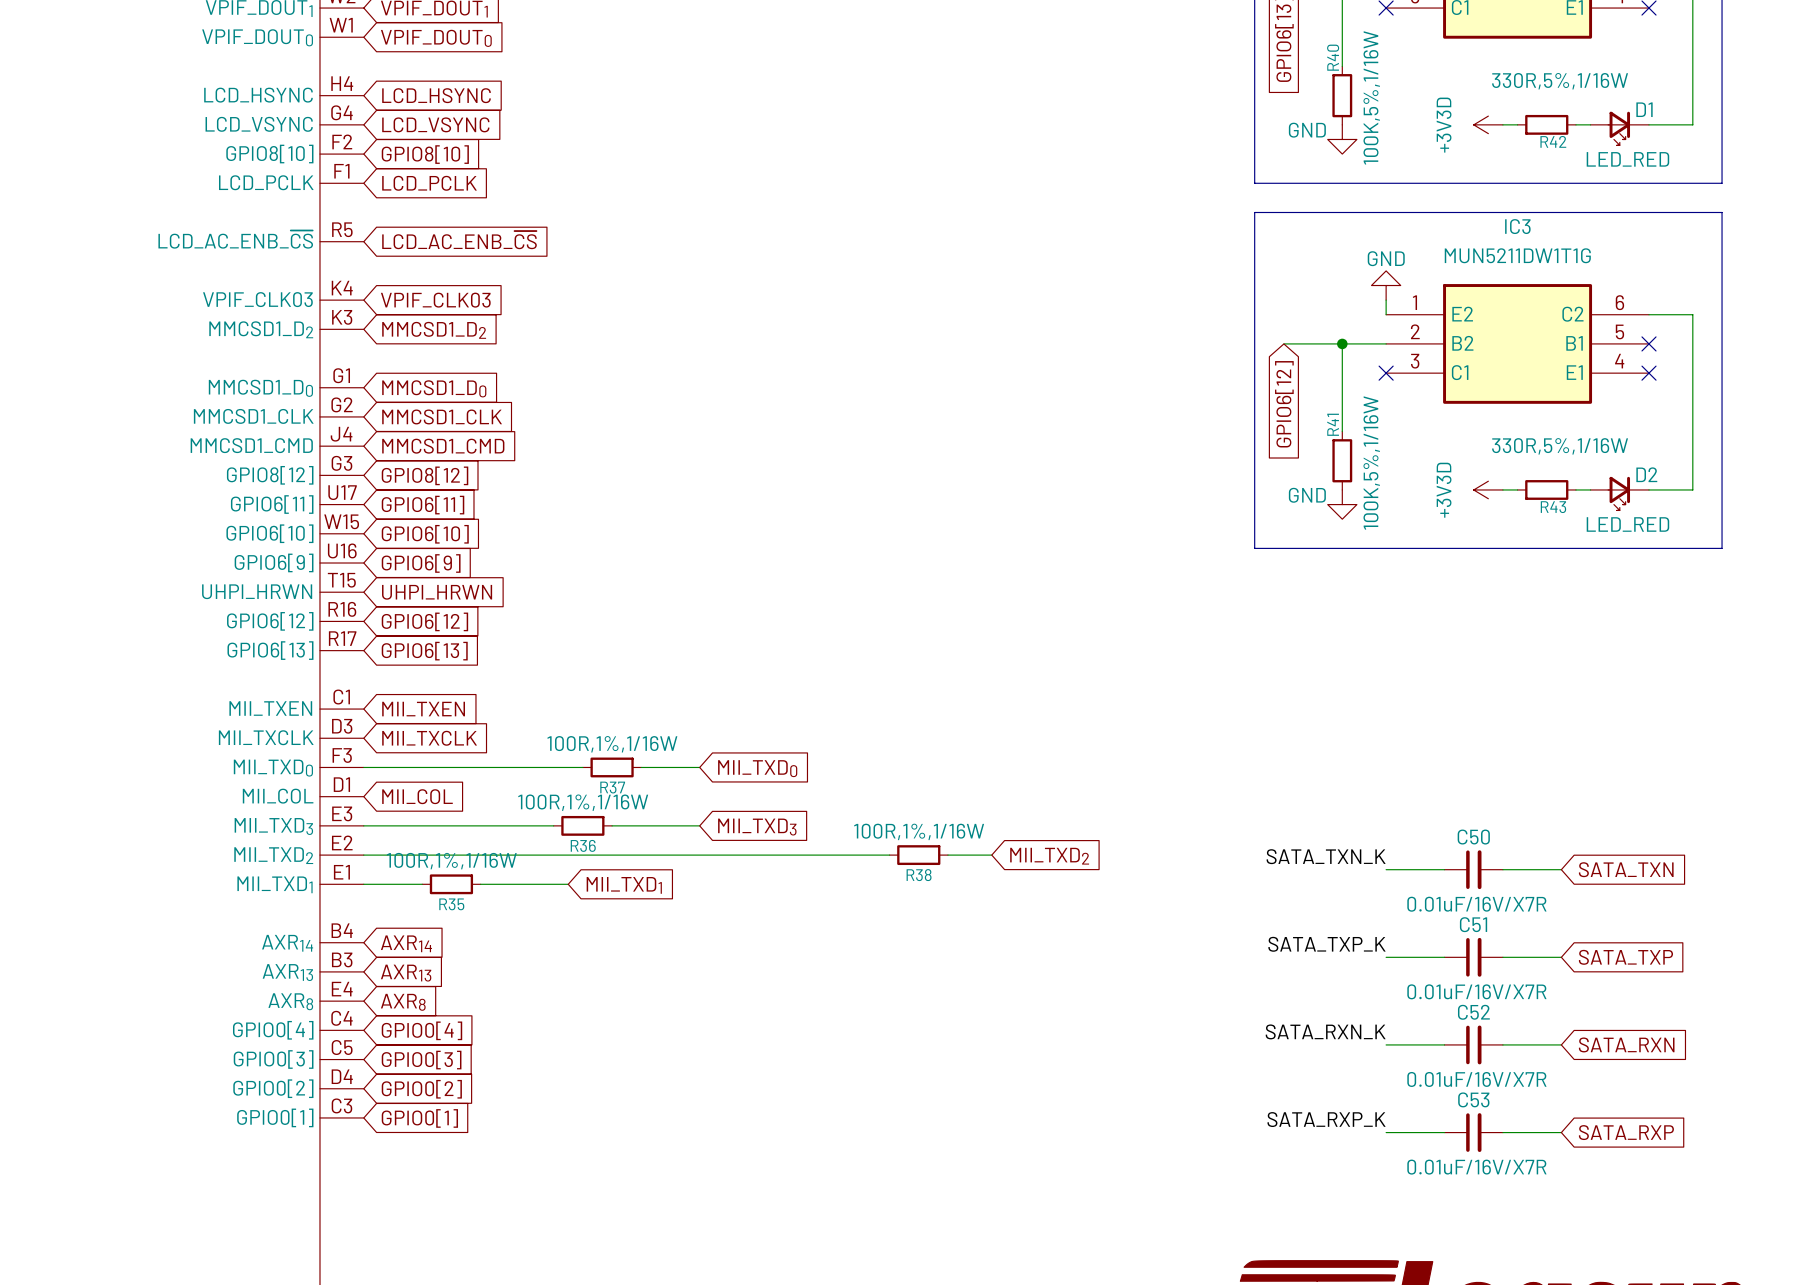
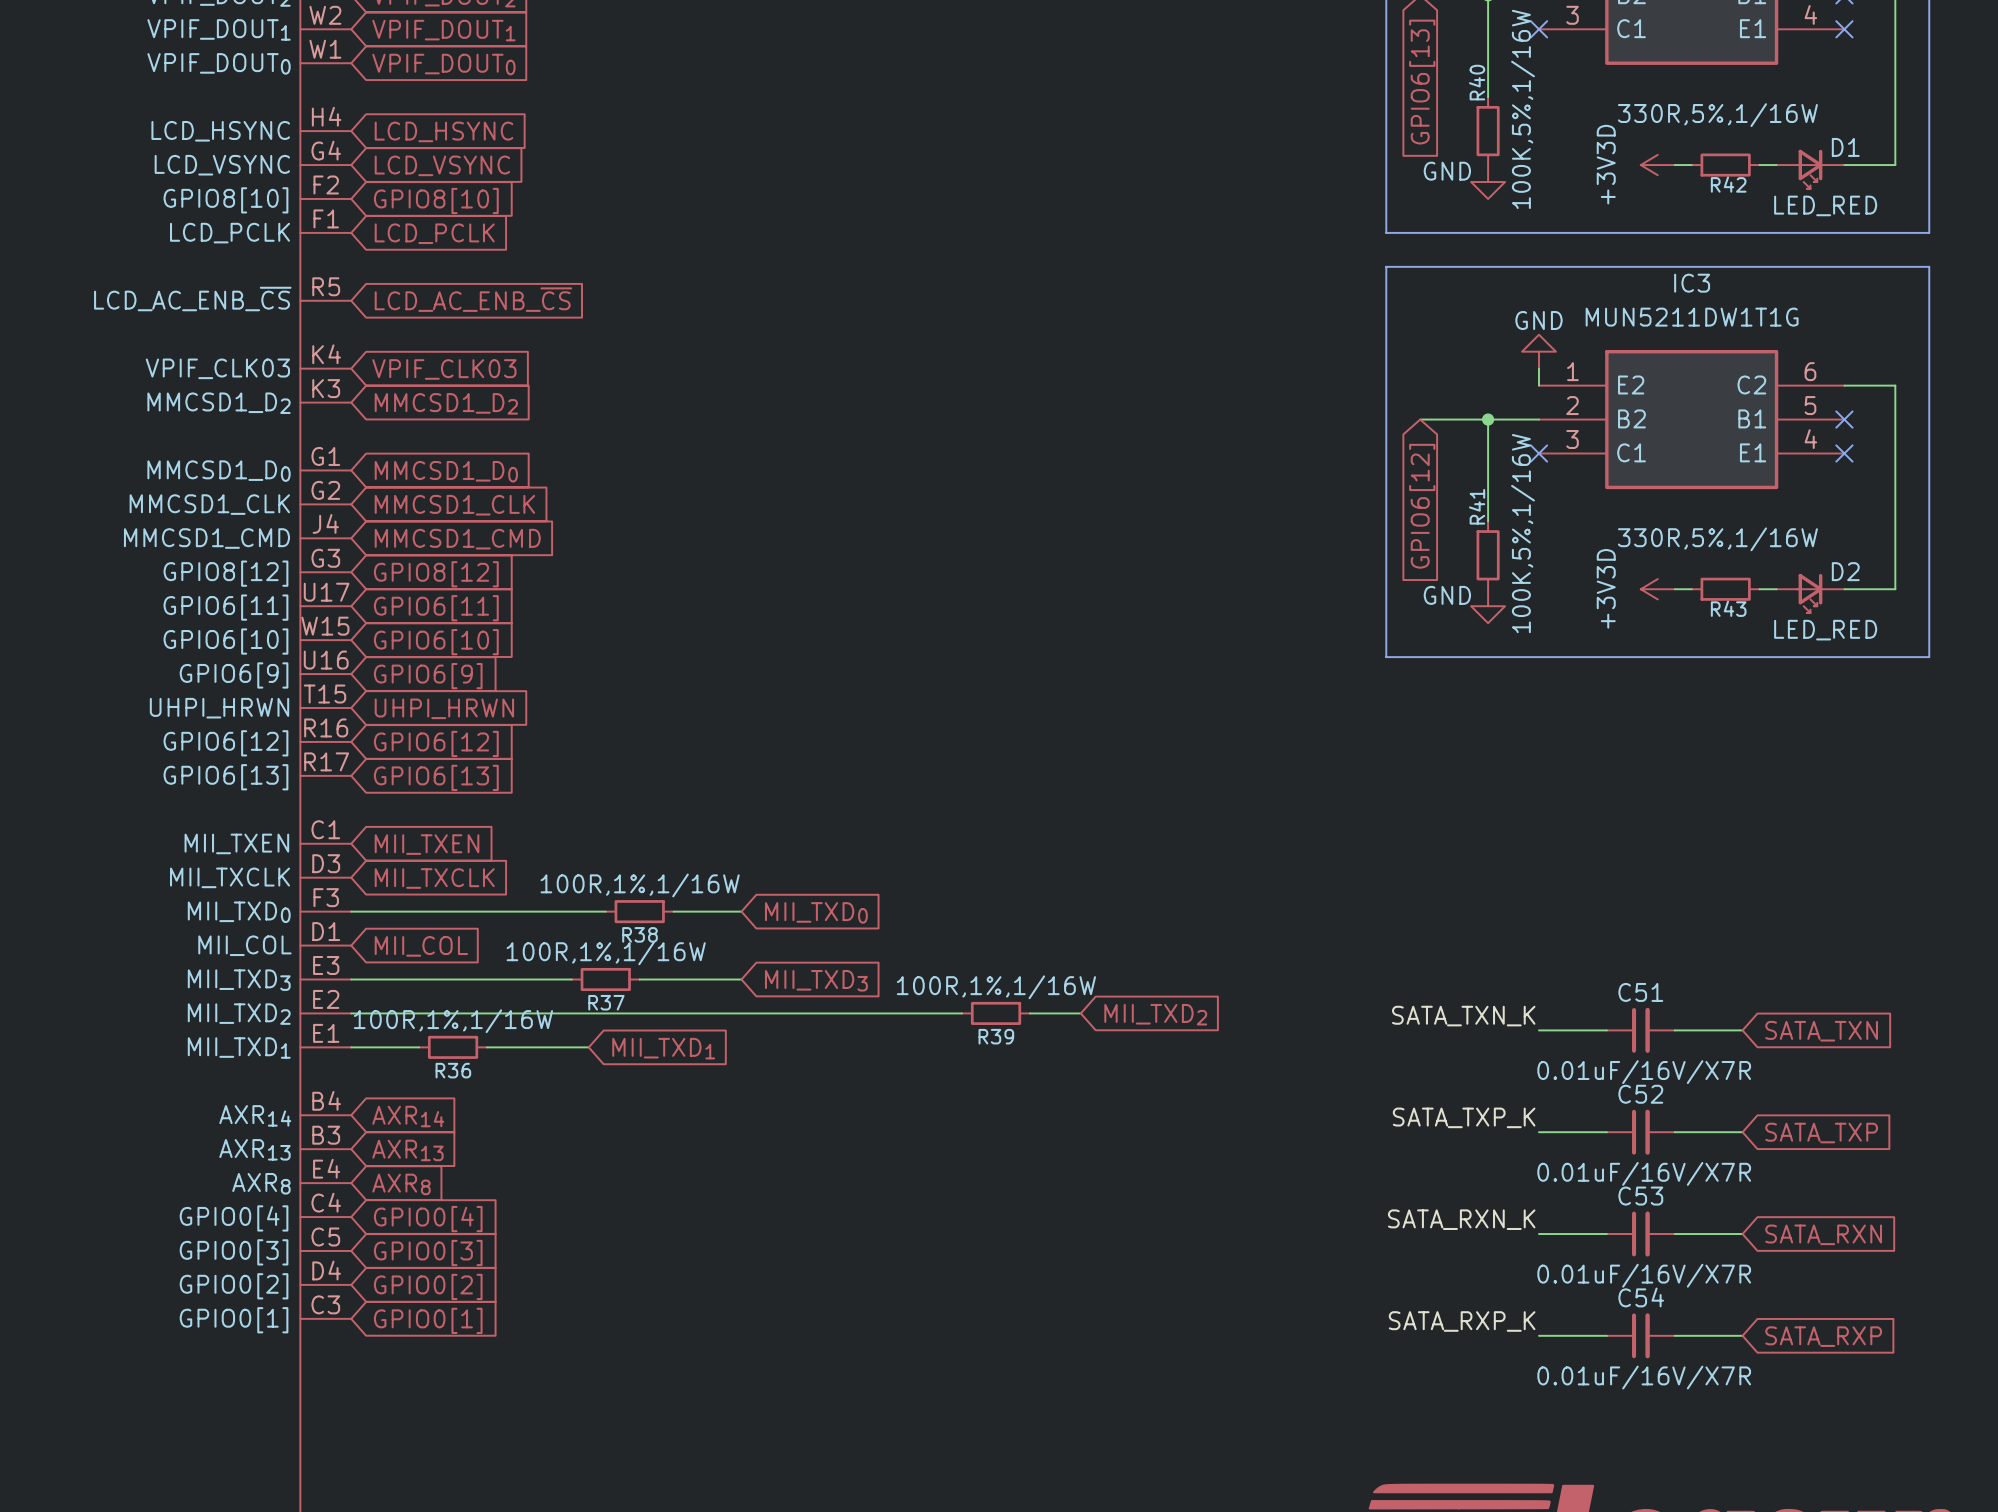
R37 name: R37 (612, 787) -> R38 (640, 934)
C50 name: C50 (1473, 837) -> C51 (1640, 992)
R36 name: R36 (583, 845) -> R37 (606, 1002)
R38 name: R38 (919, 875) -> R39 (996, 1036)
R35 name: R35 (451, 904) -> R36 (453, 1070)
C51 name: C51 (1473, 924) -> C52 (1640, 1094)
C52 name: C52 (1473, 1012) -> C53 (1640, 1196)
C53 name: C53 (1473, 1099) -> C54 (1641, 1297)

